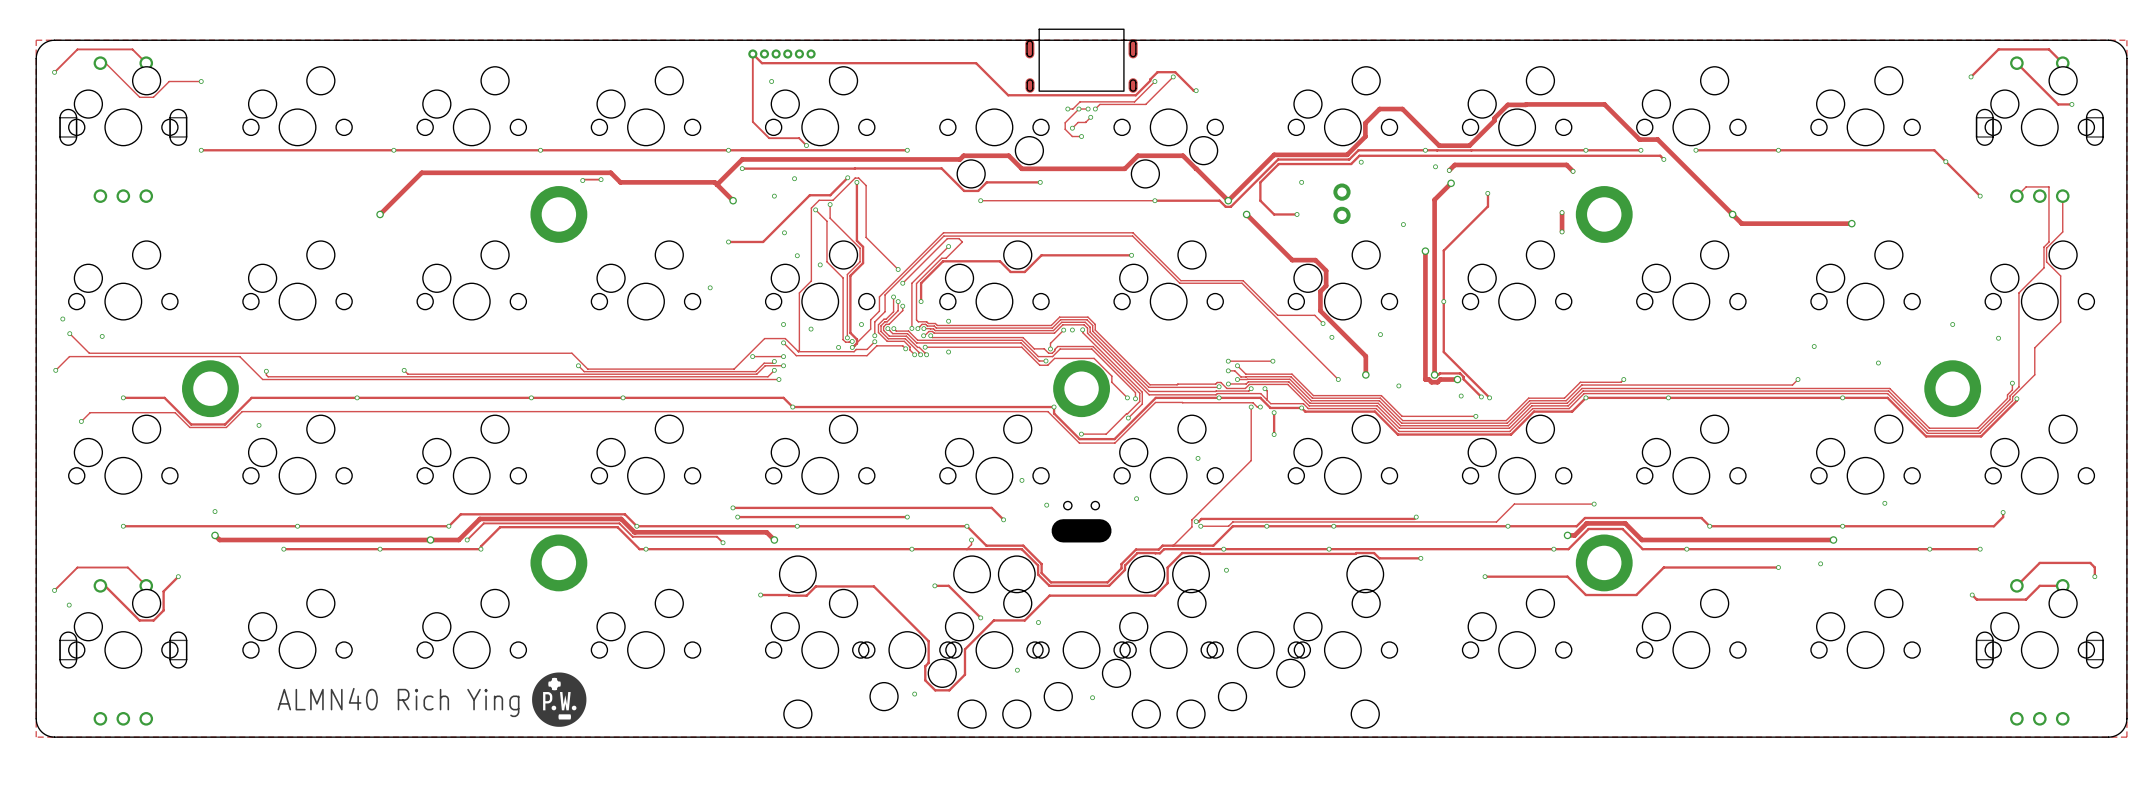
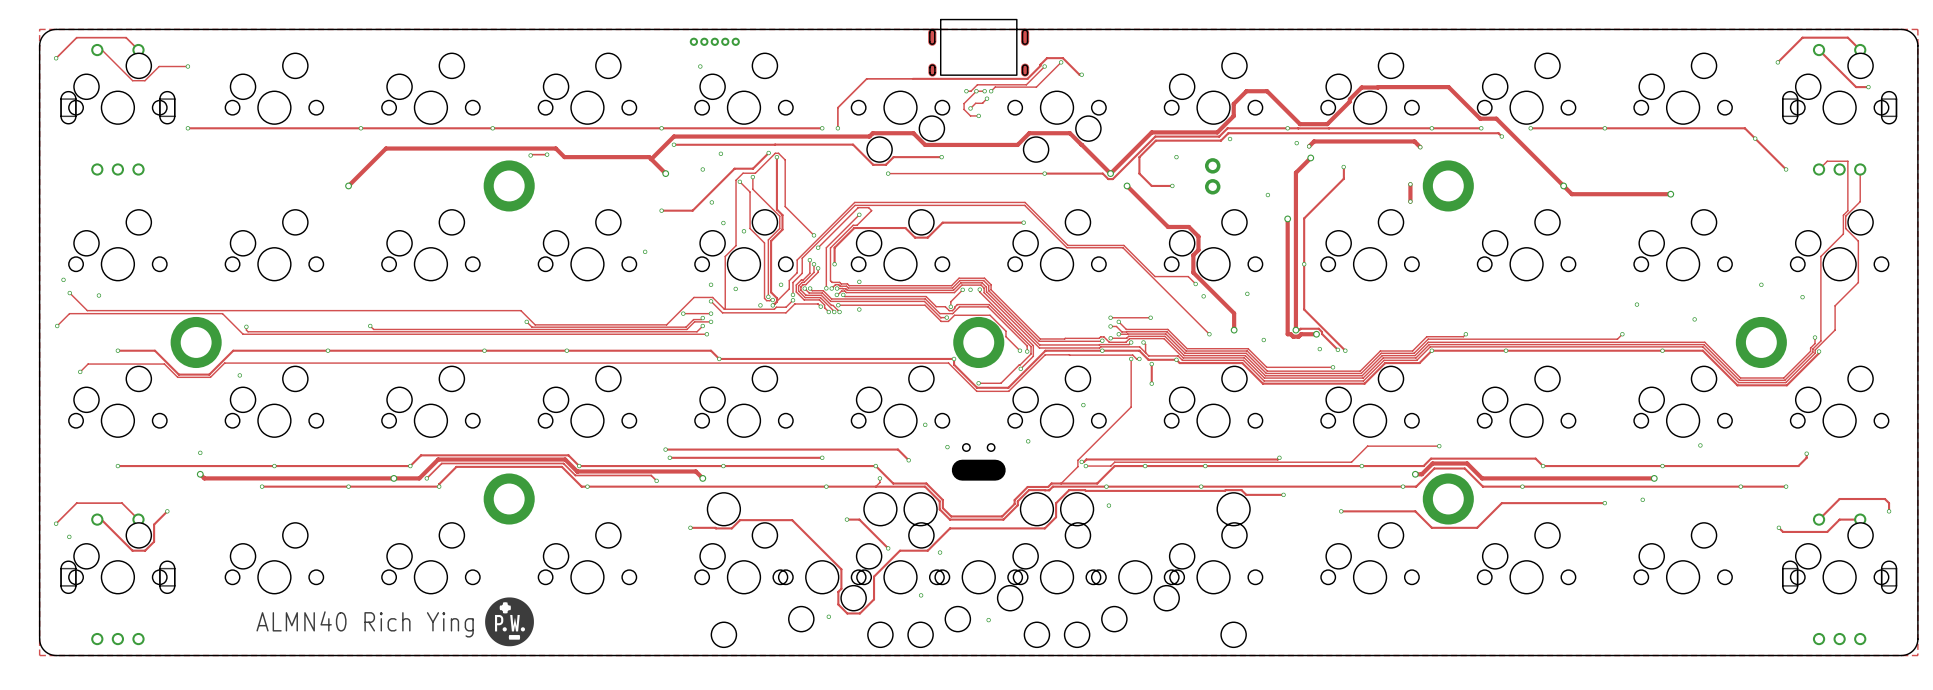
part footprint: [748, 49, 816, 59] -> [689, 37, 740, 46]
track: (1008, 95) (976, 63) (762, 63) (752, 54) (752, 121) (769, 138) (799, 138) (806, 145) -> (912, 78) (866, 78) (837, 107) (837, 128)
via: (806, 145) -> none
via: none -> (837, 128)

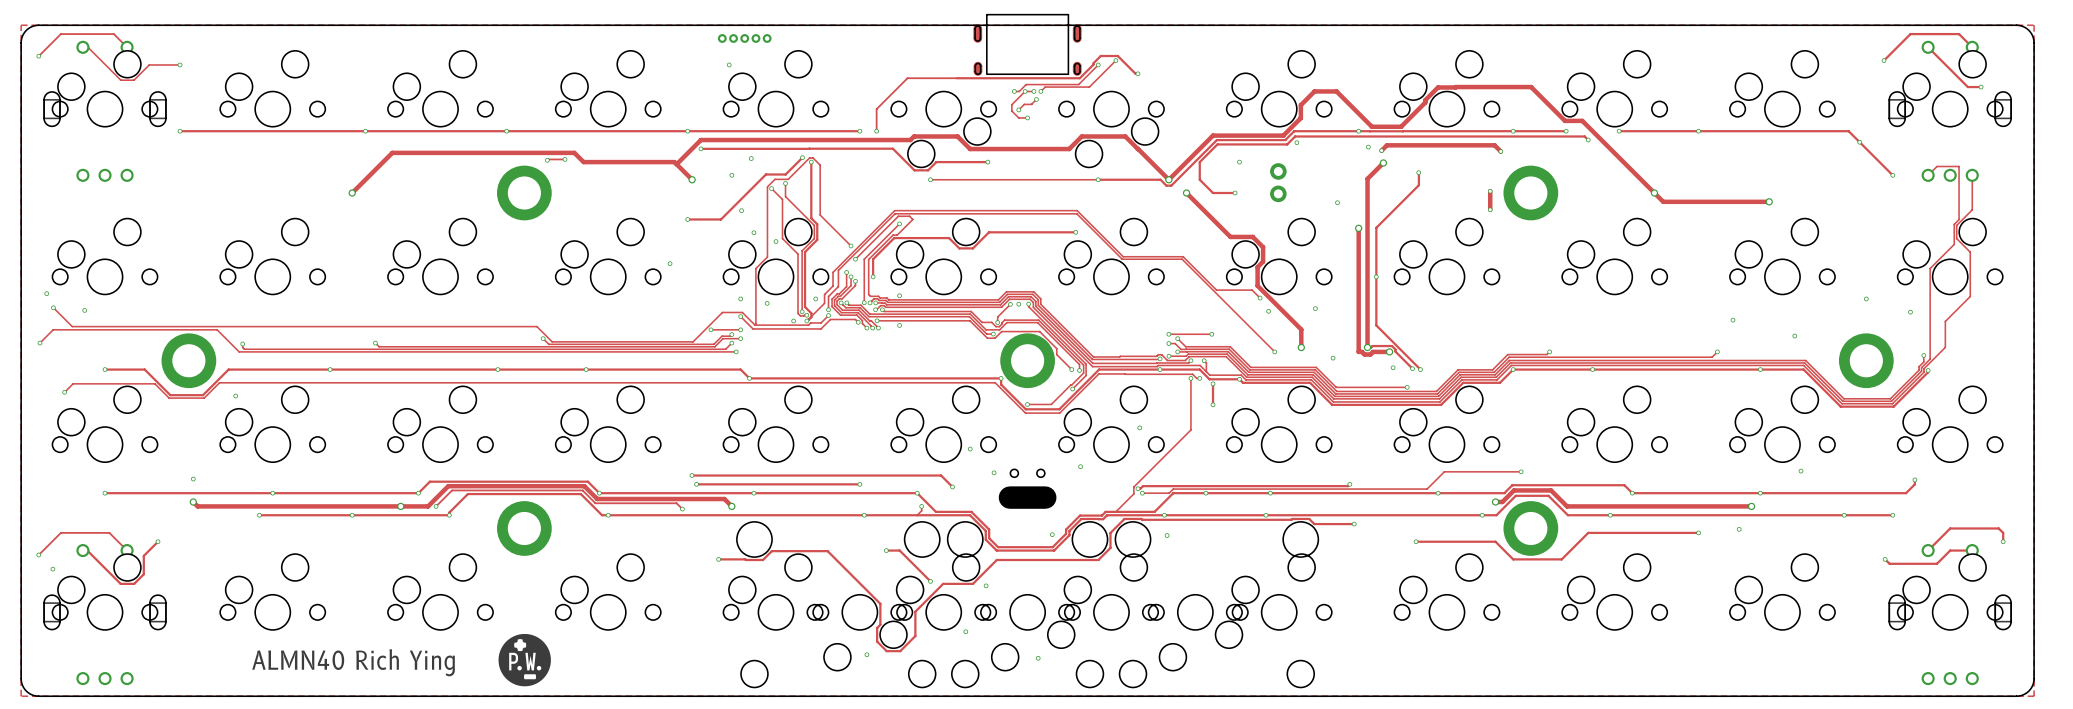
via: none -> (1052, 534)

